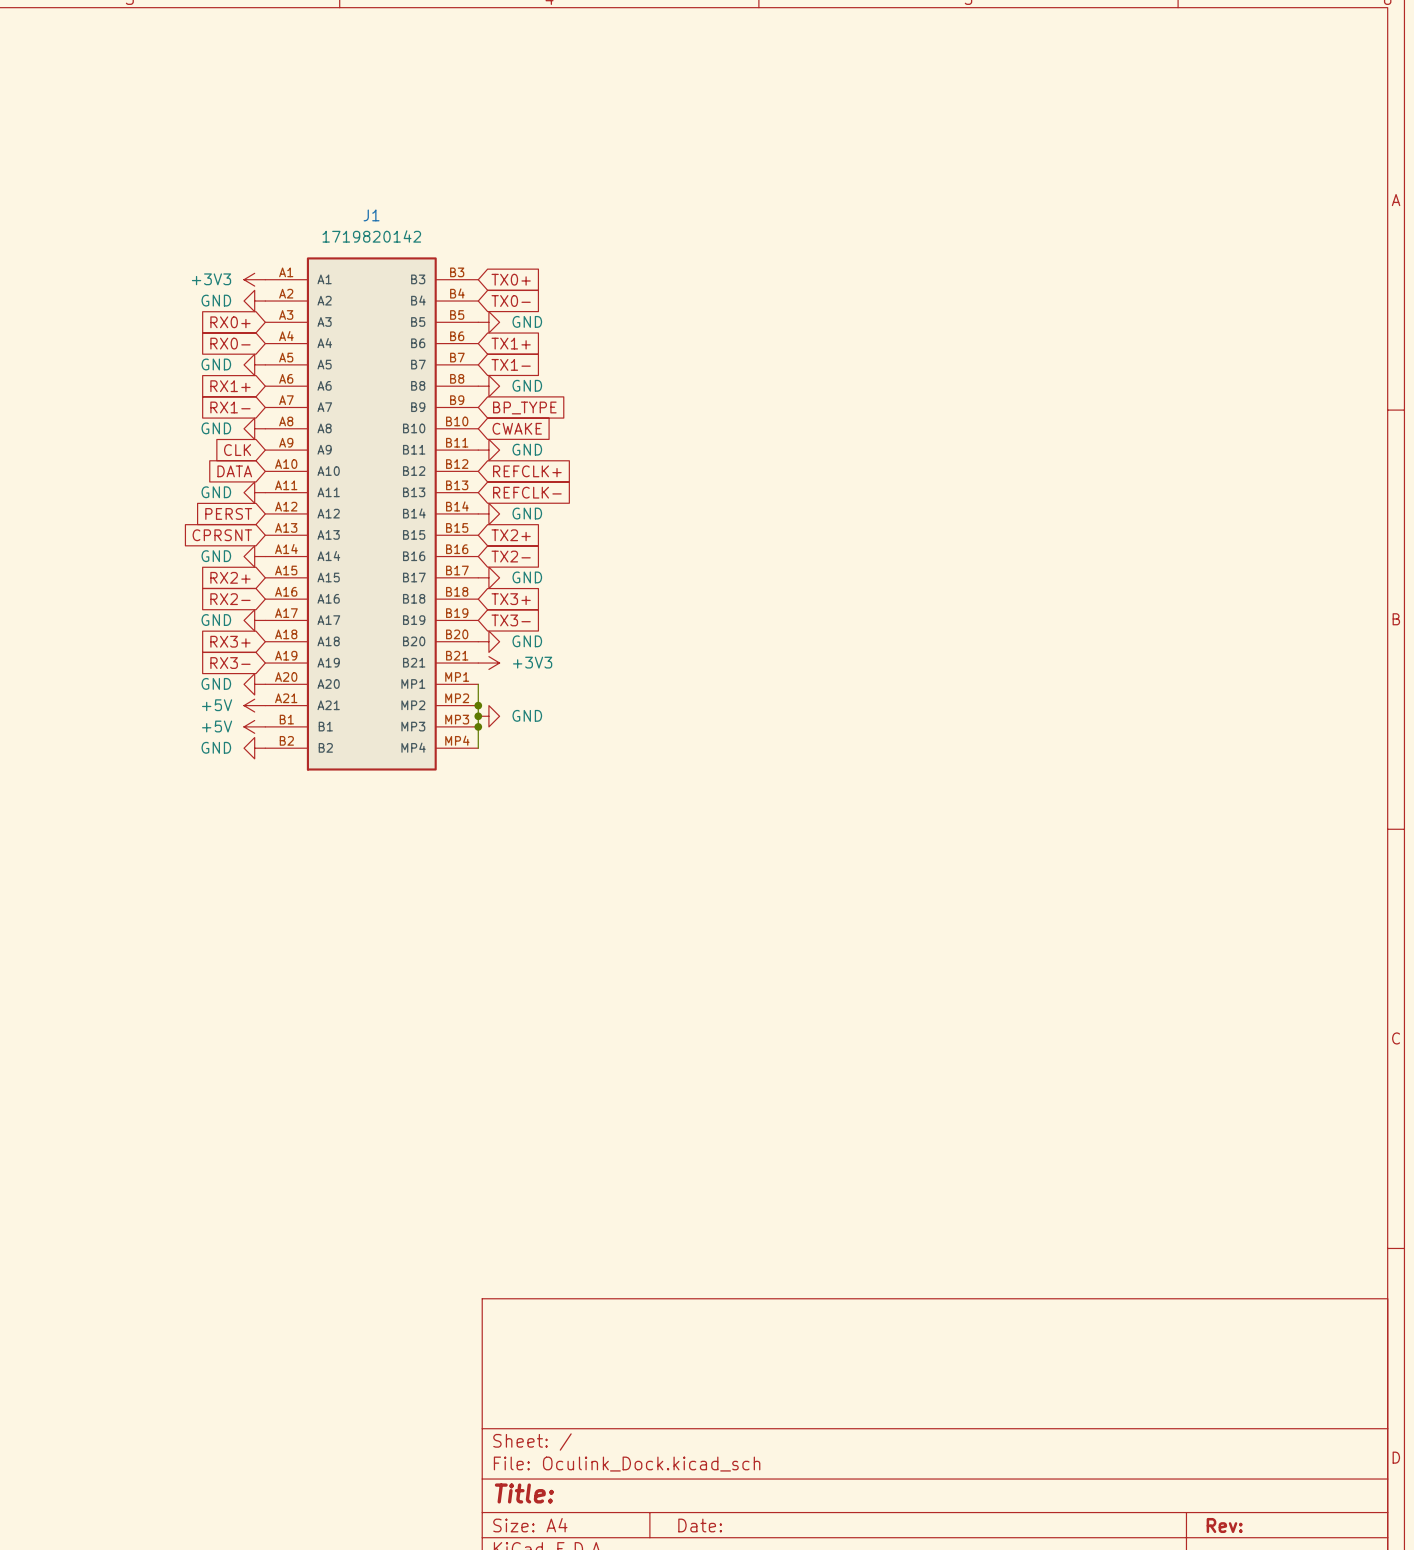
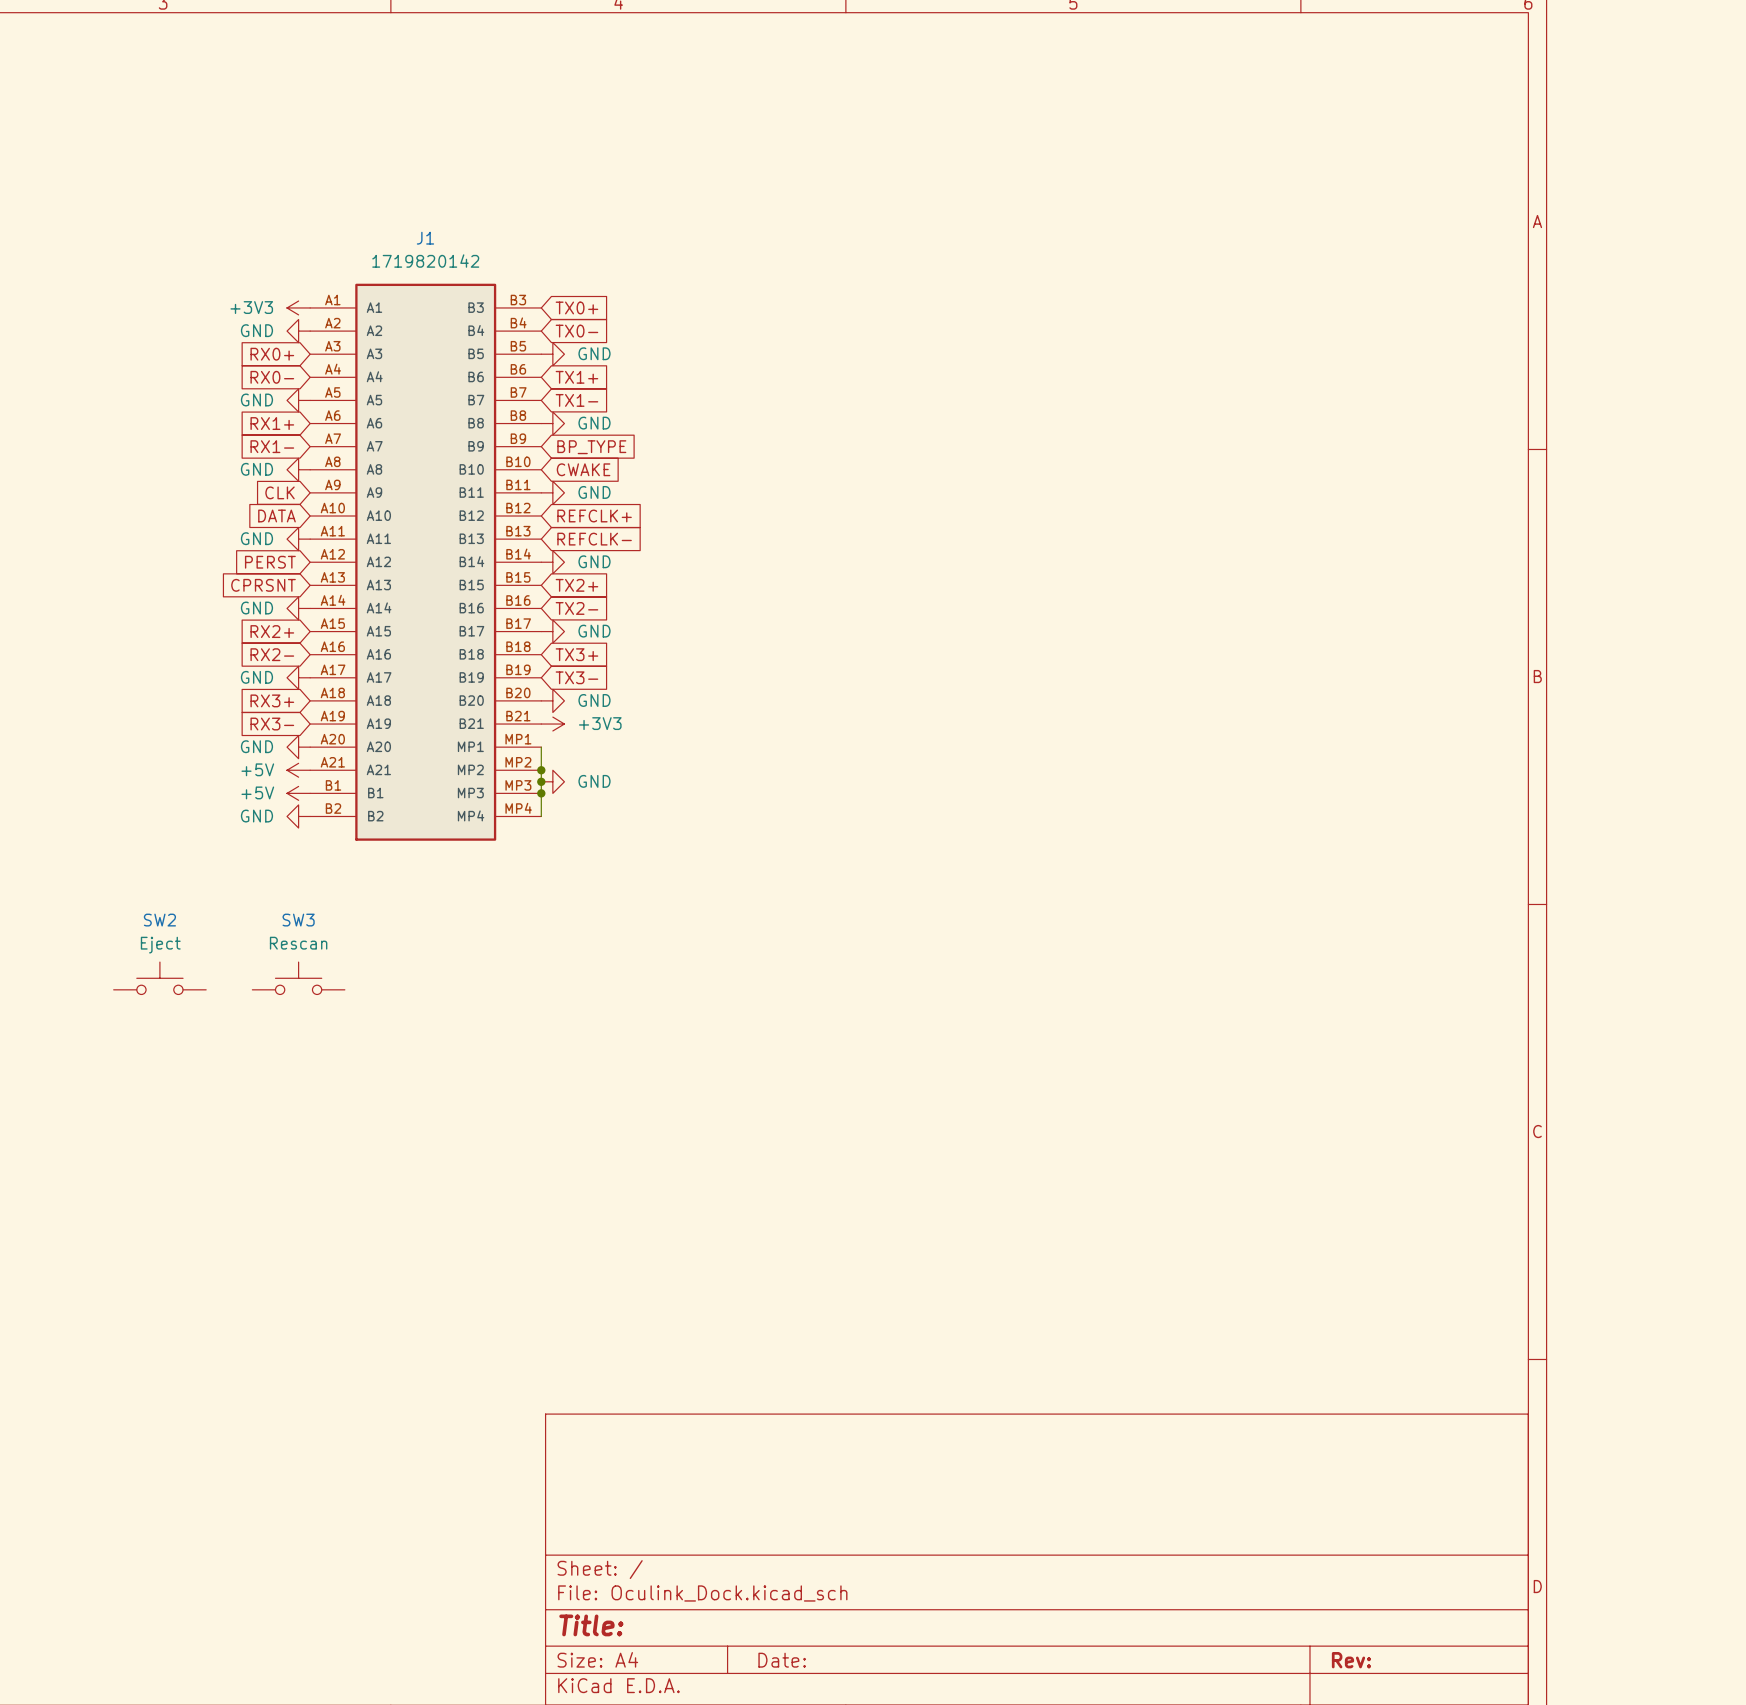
SW2: none -> Eject (159, 978)
SW3: none -> Rescan (298, 978)

